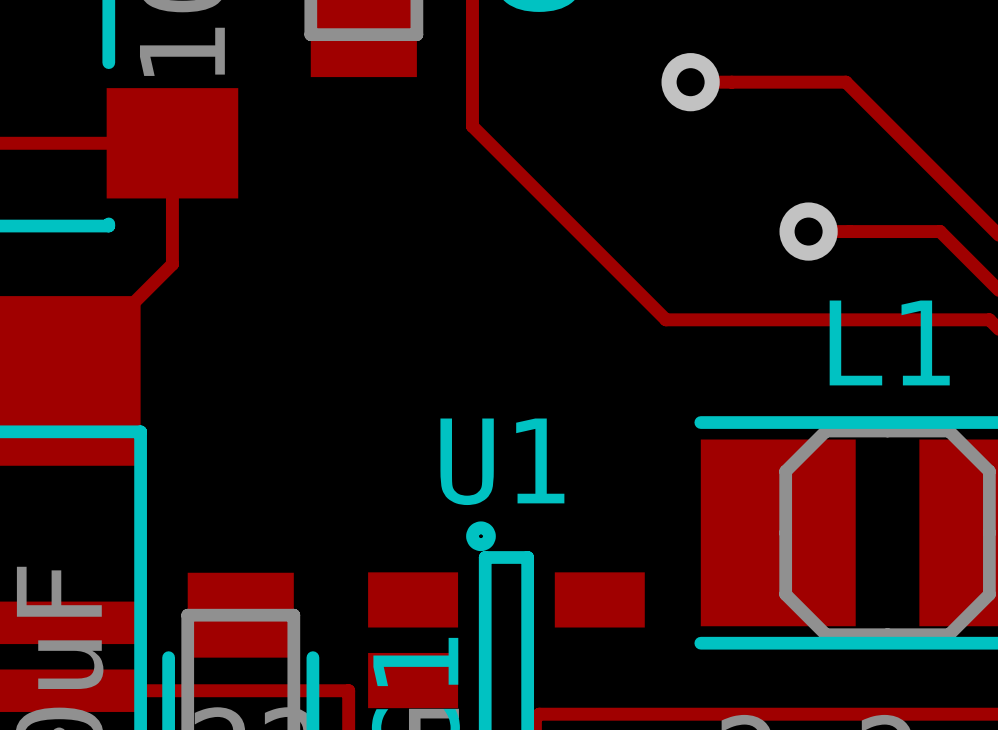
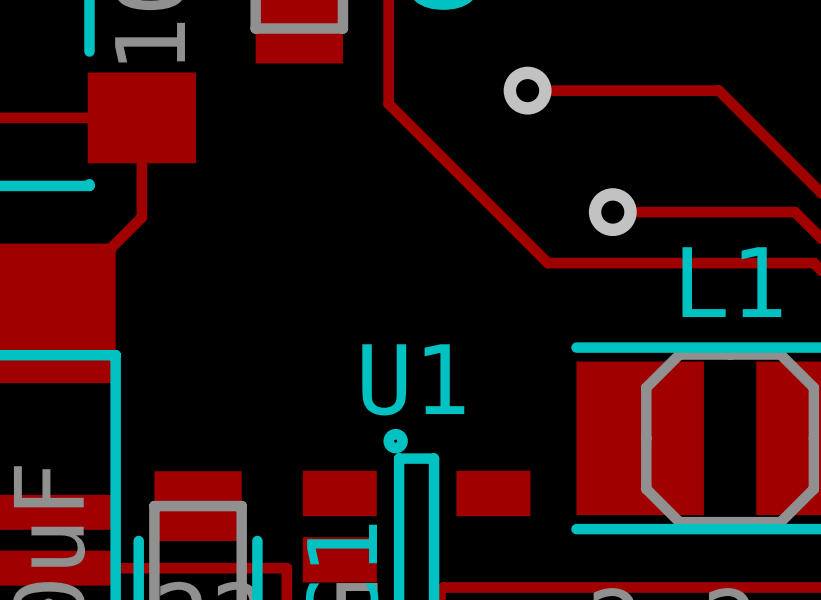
track: (690, 82) (845, 82) (873, 110) -> (527, 90) (718, 90)
via position: (690, 82) -> (527, 90)
track: (808, 231) (940, 231) (966, 257) -> (612, 212) (795, 212)
via position: (808, 231) -> (612, 212)

